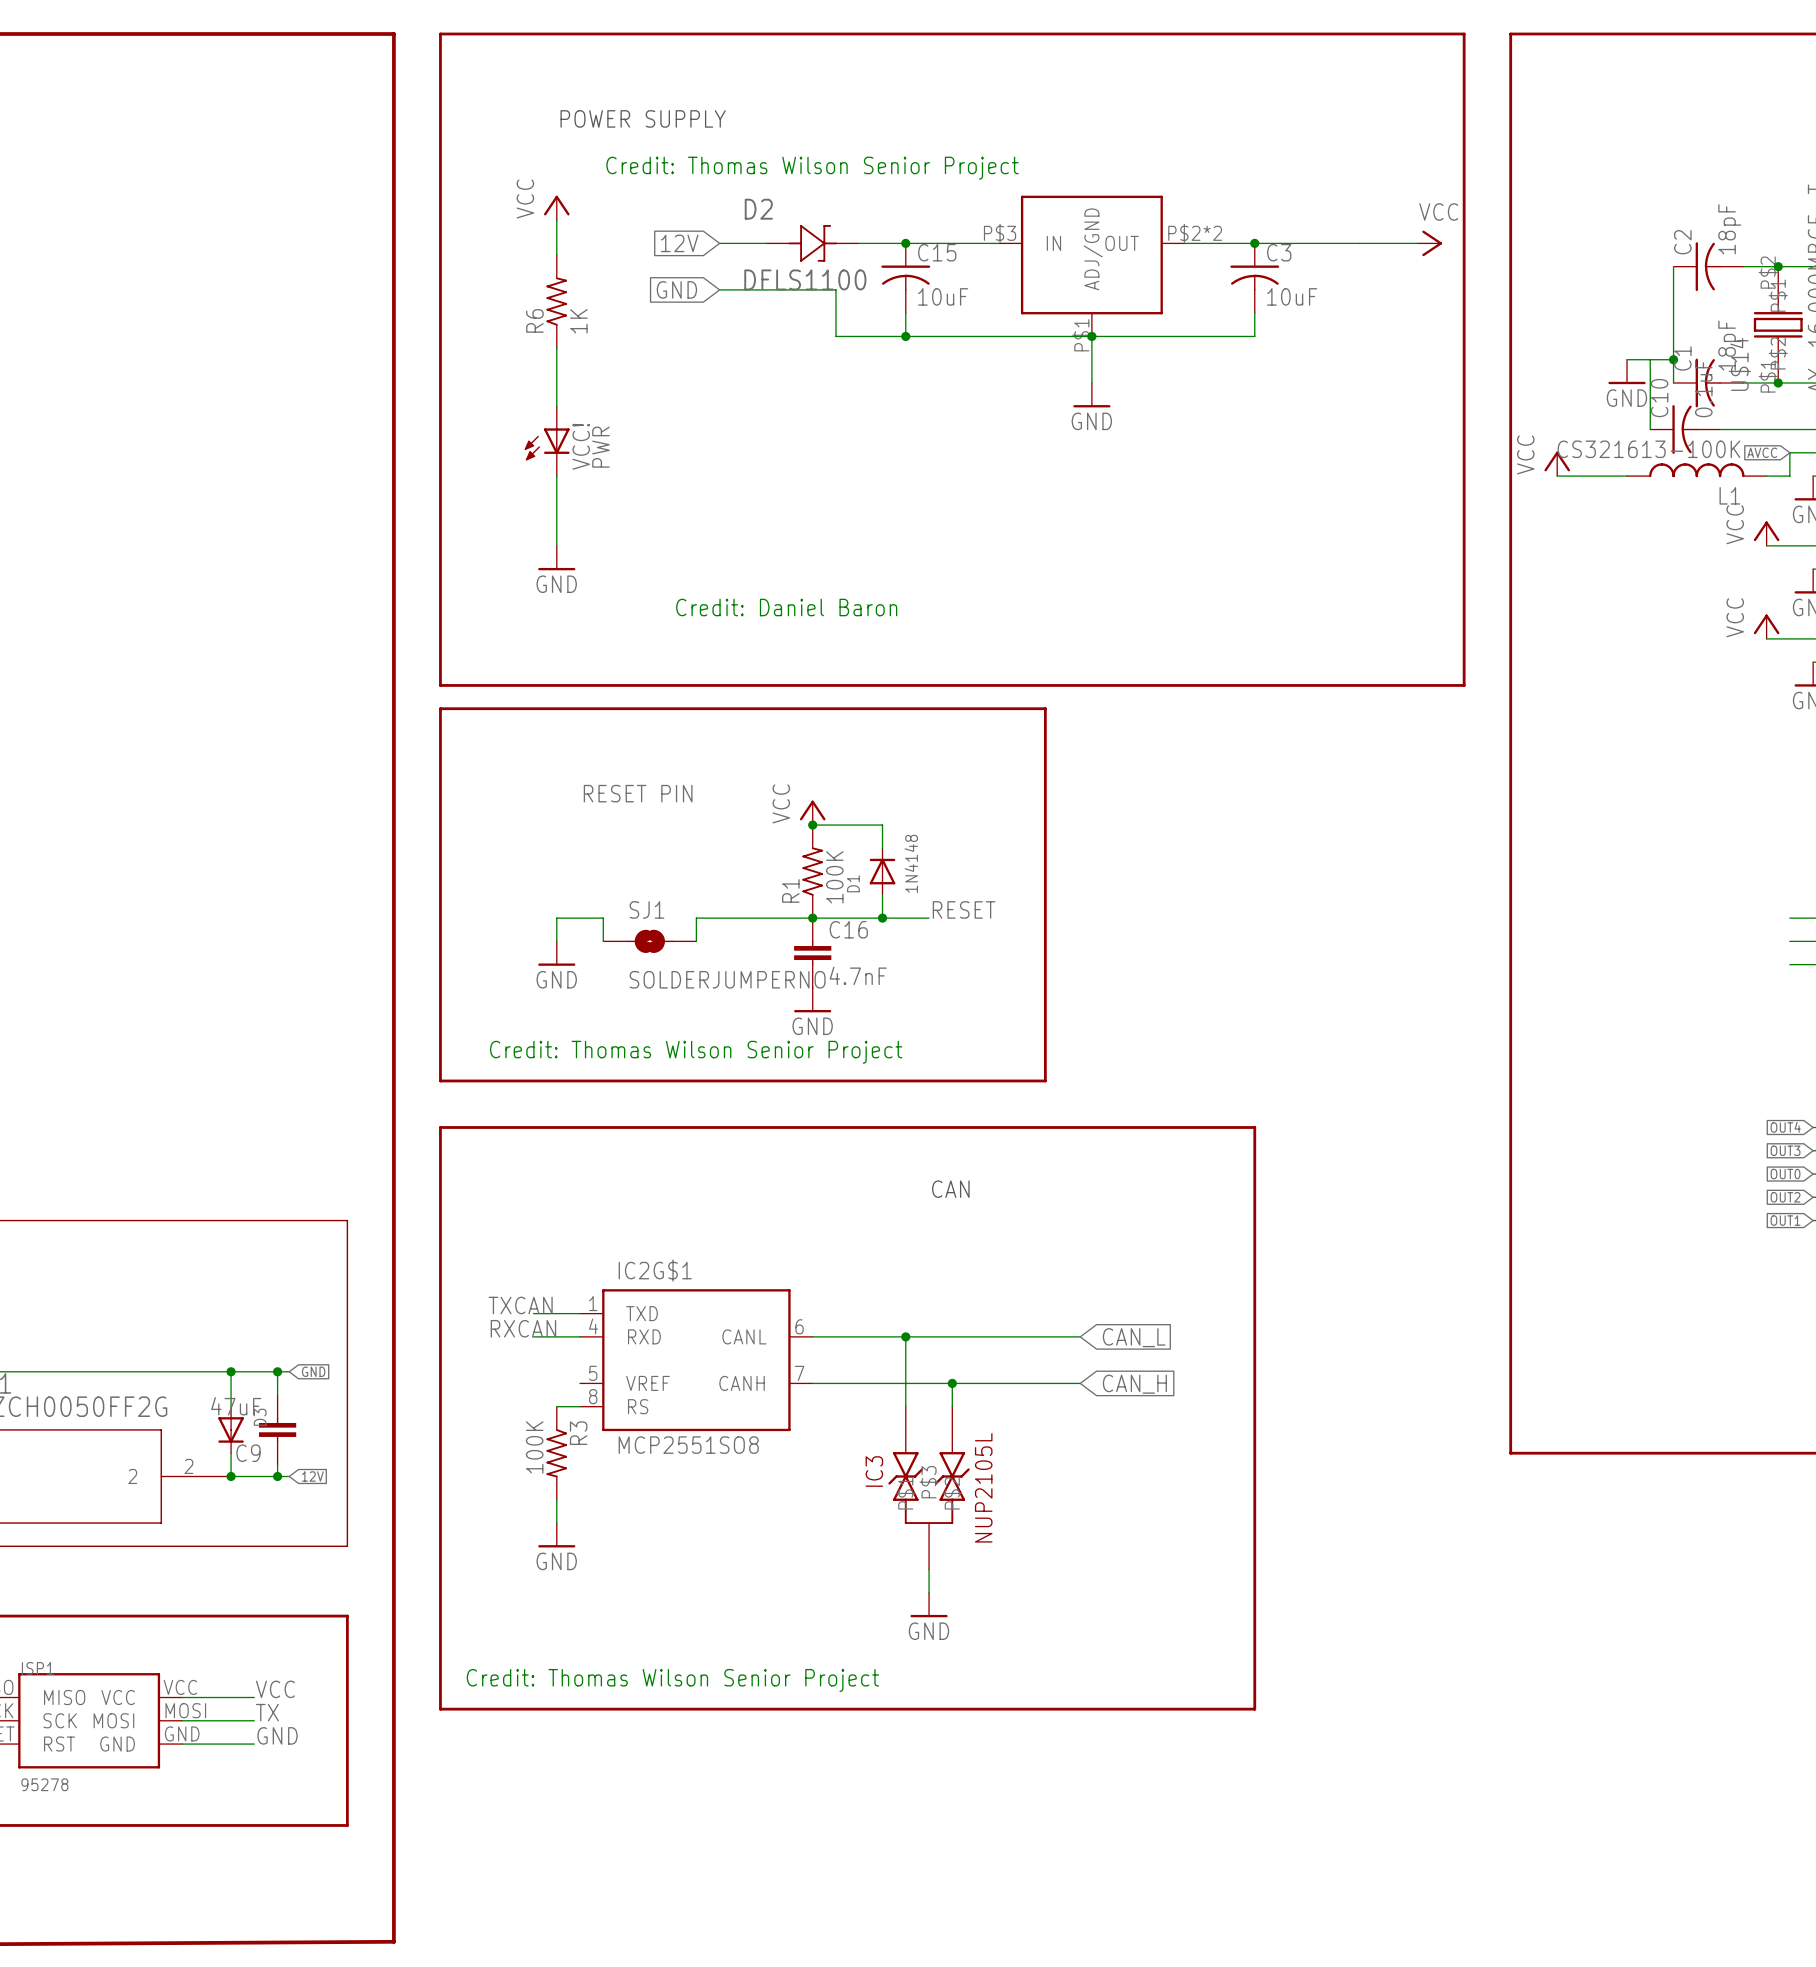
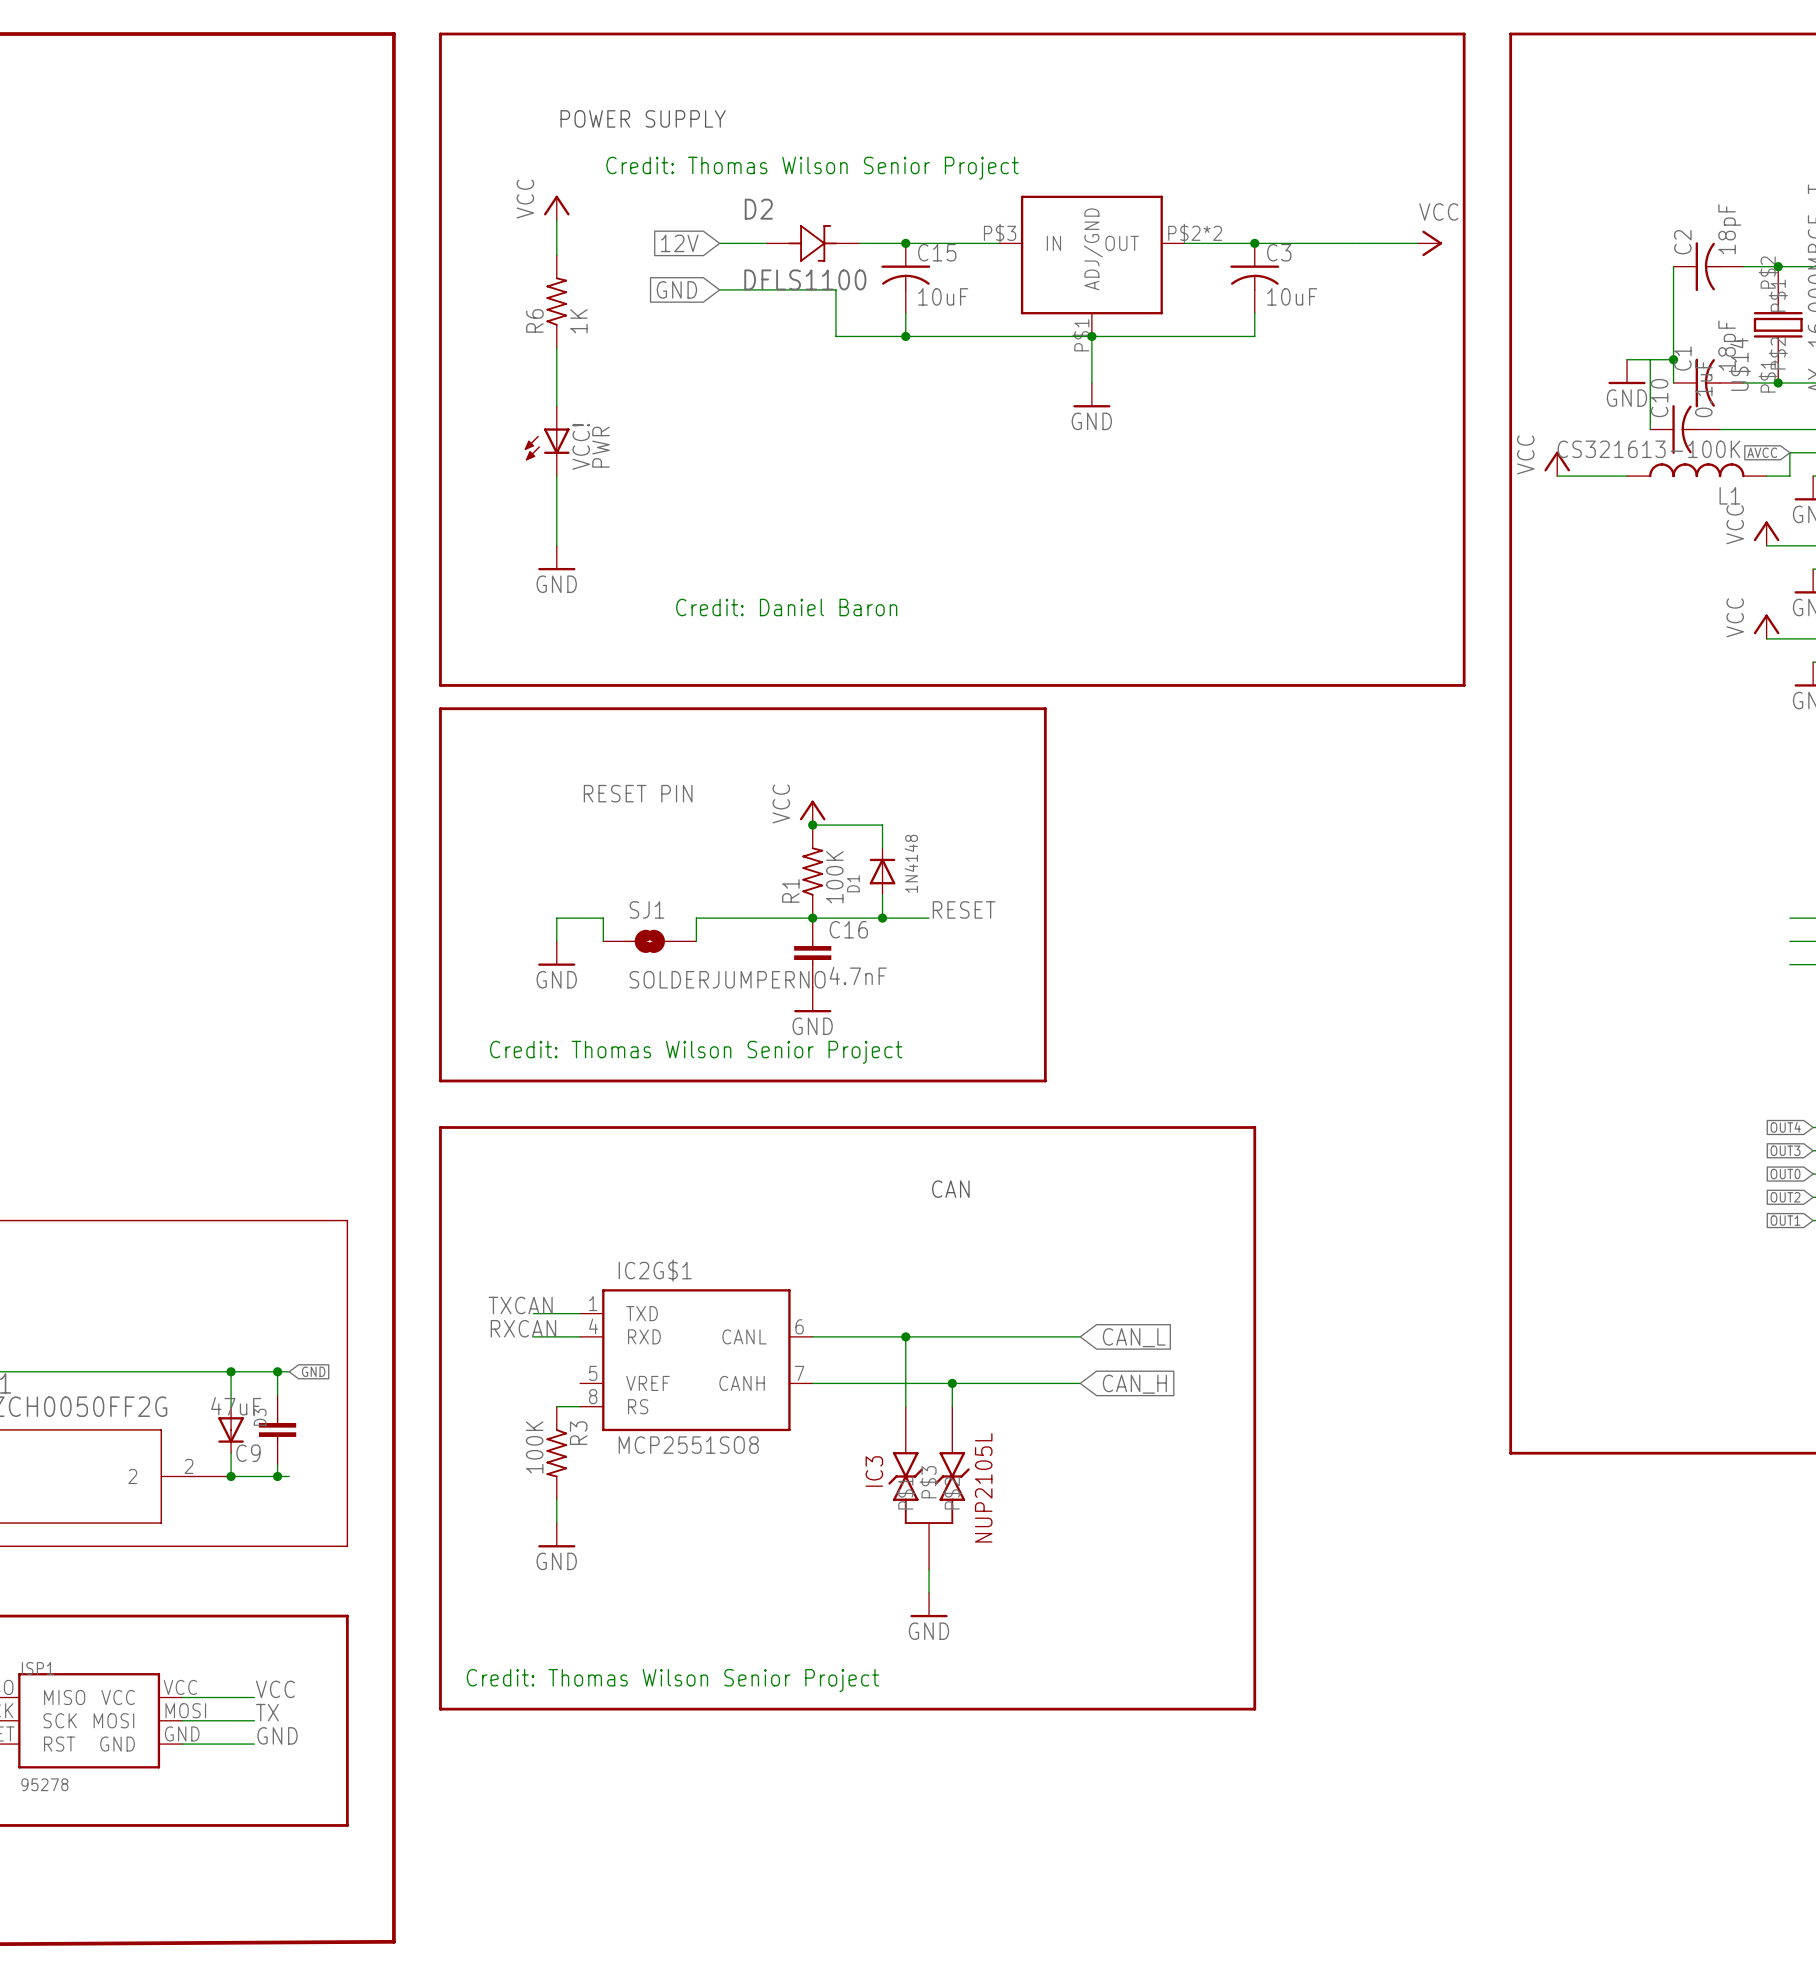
global label: 12V (312, 1476) -> none

